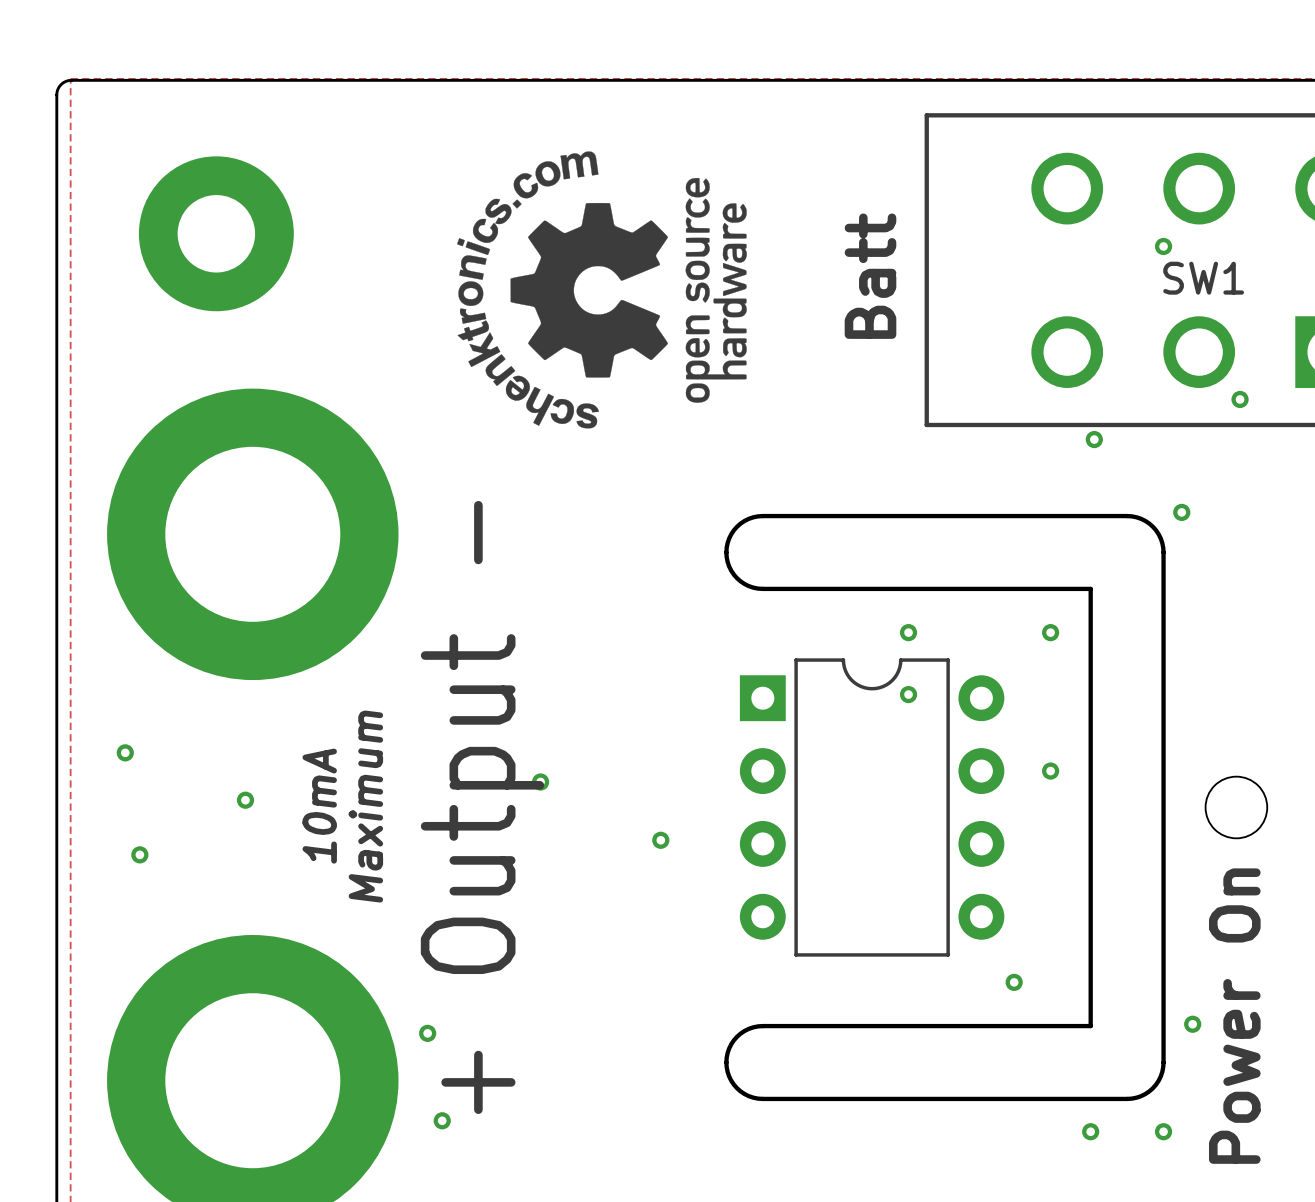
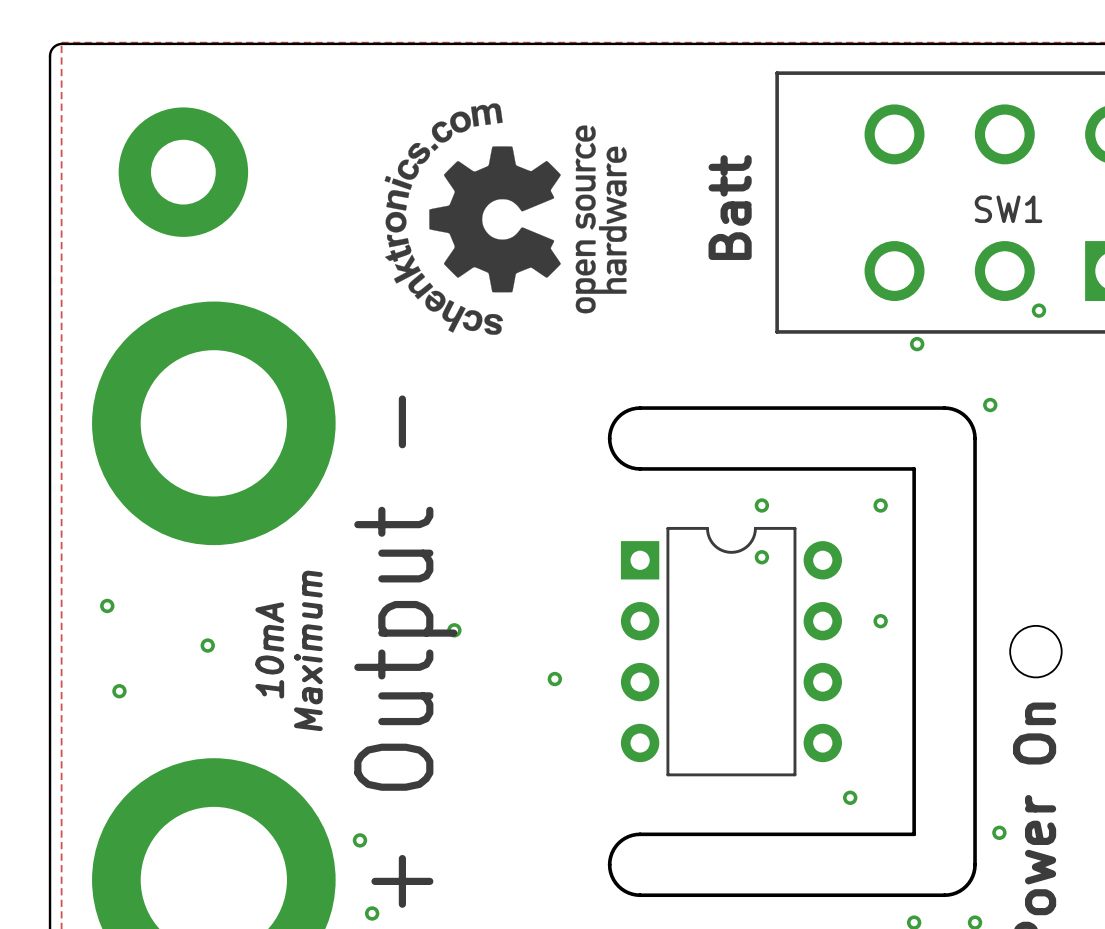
part: (1163, 246) -> none

